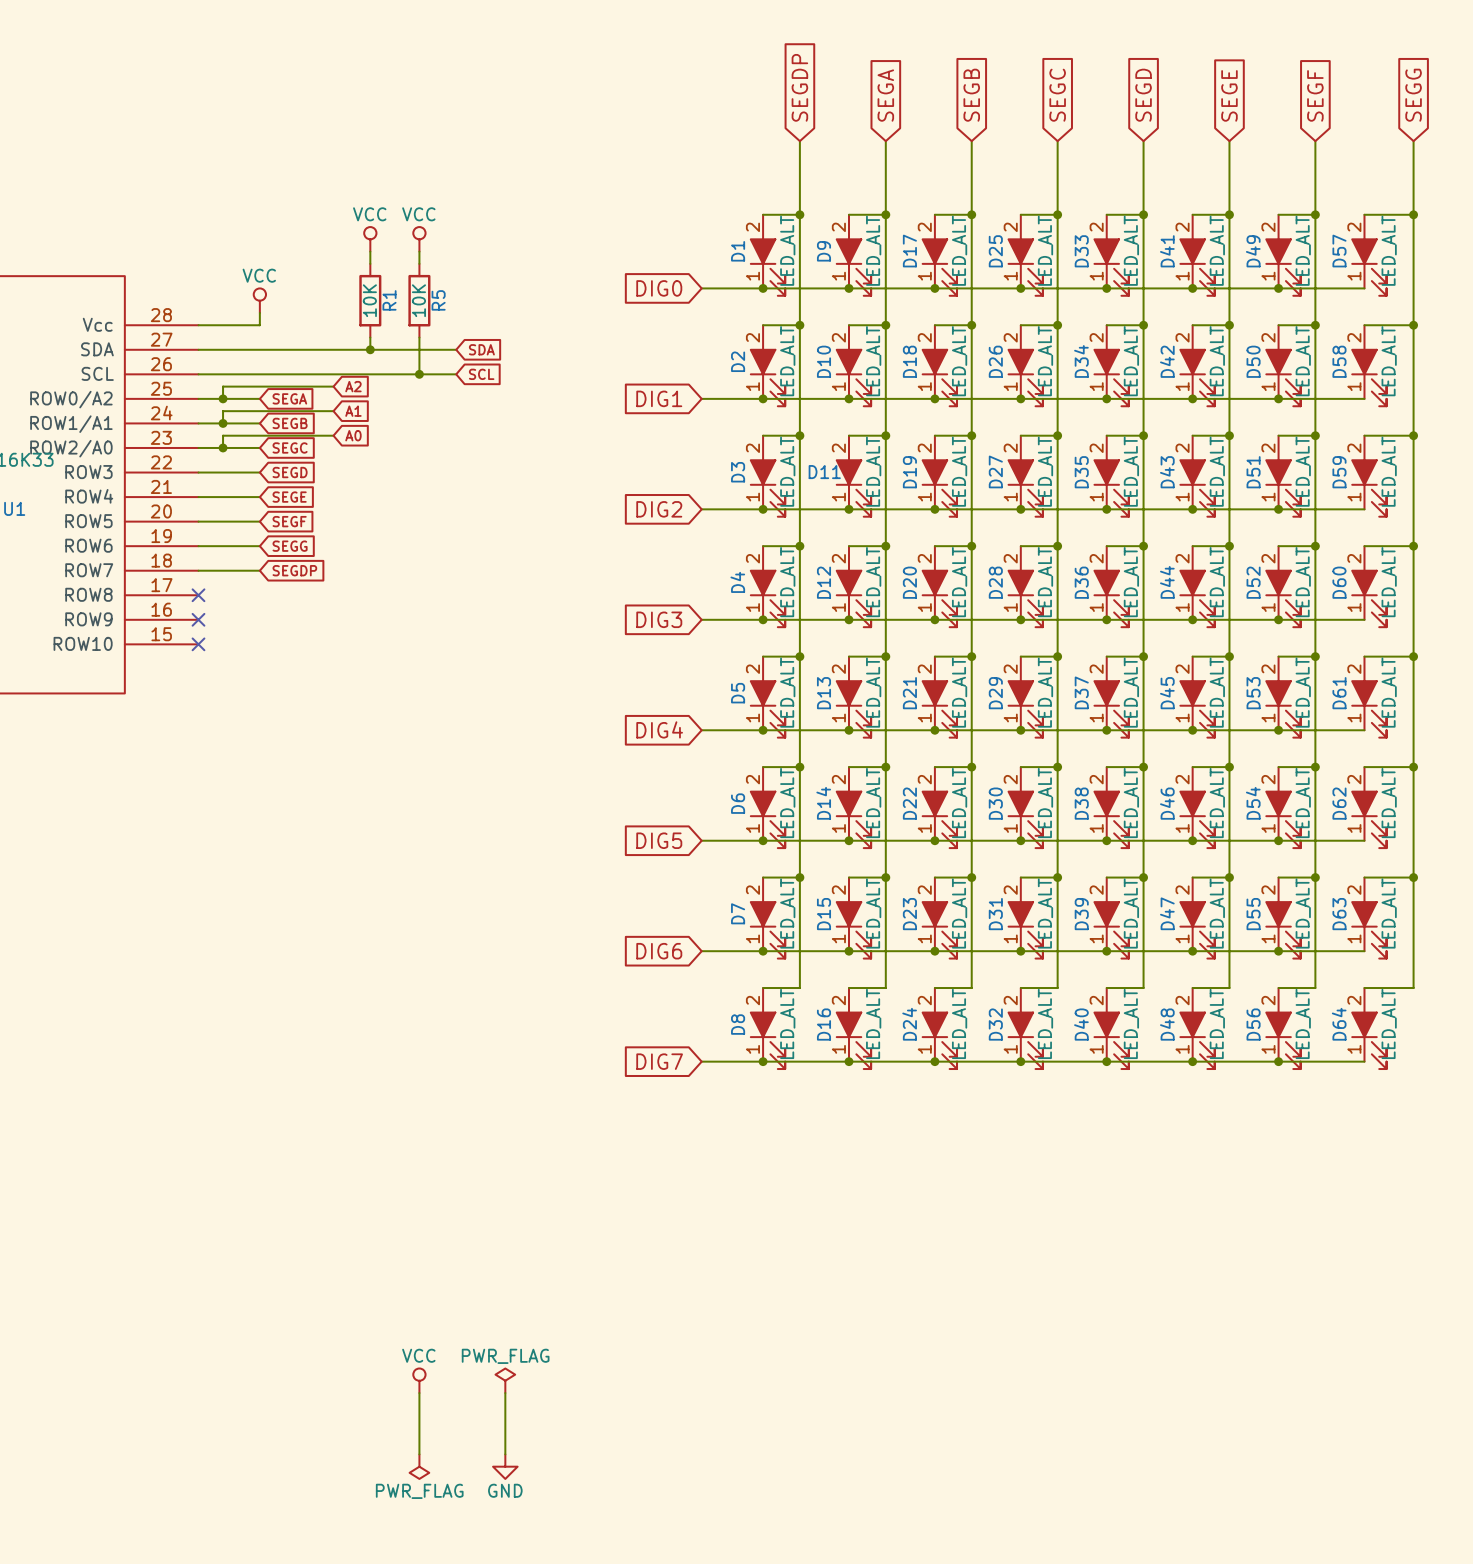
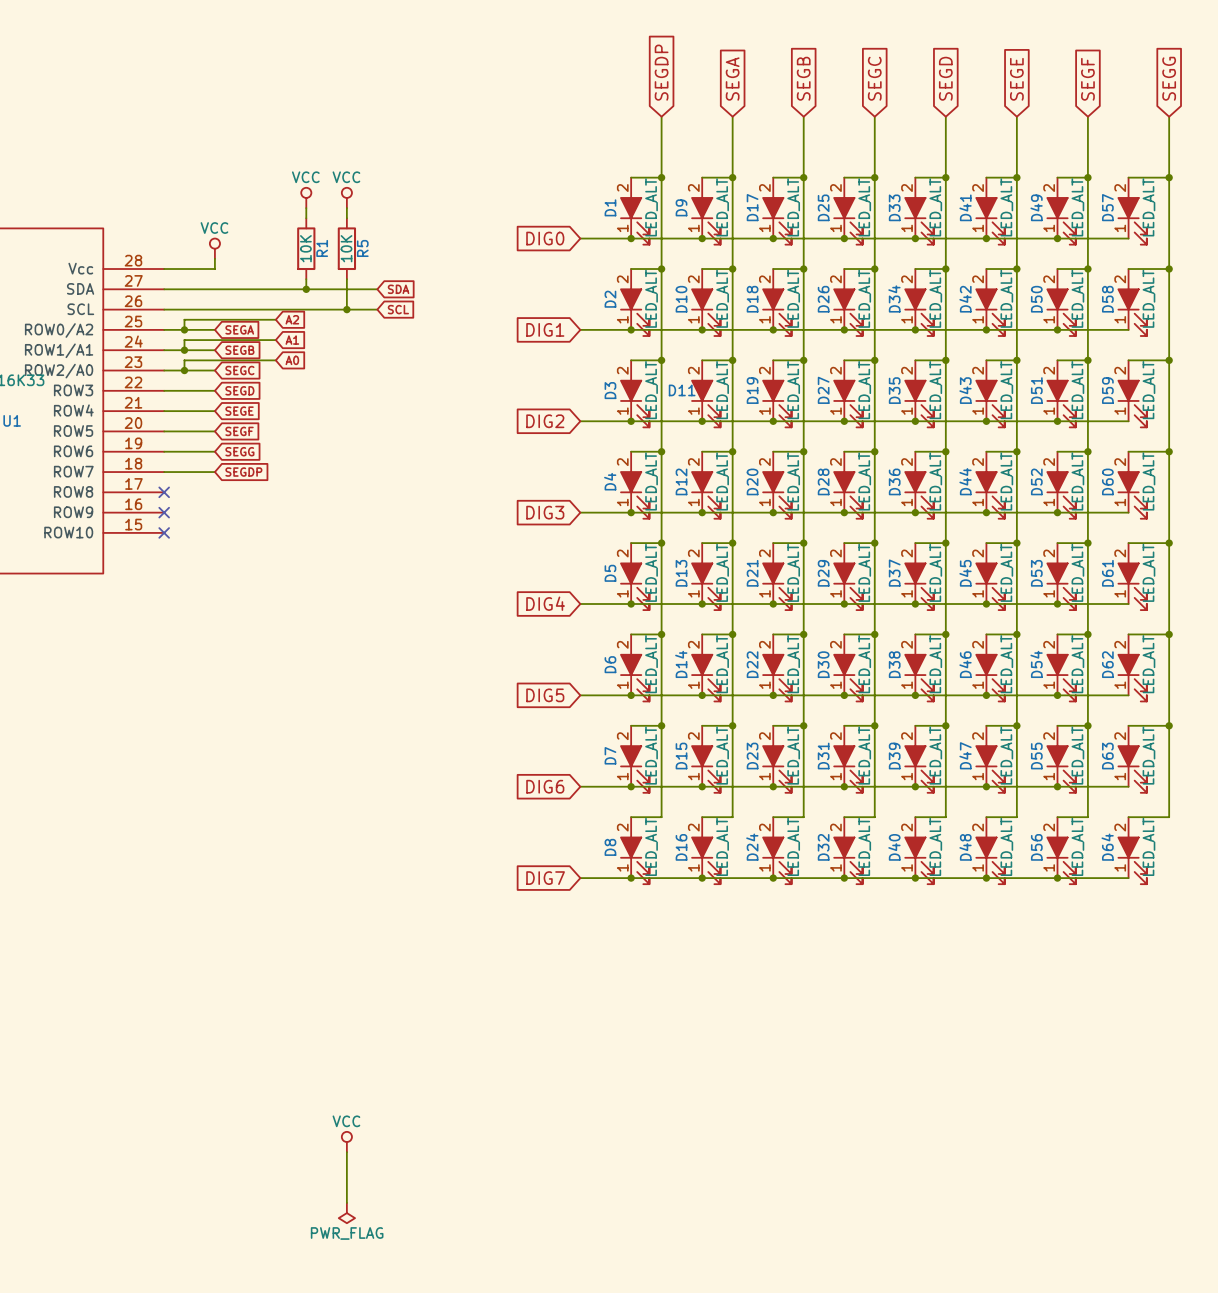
power symbol: PWR_FLAG (505, 1380) -> none
wire: (505, 1393) (505, 1454) -> none
power symbol: GND (505, 1466) -> none

